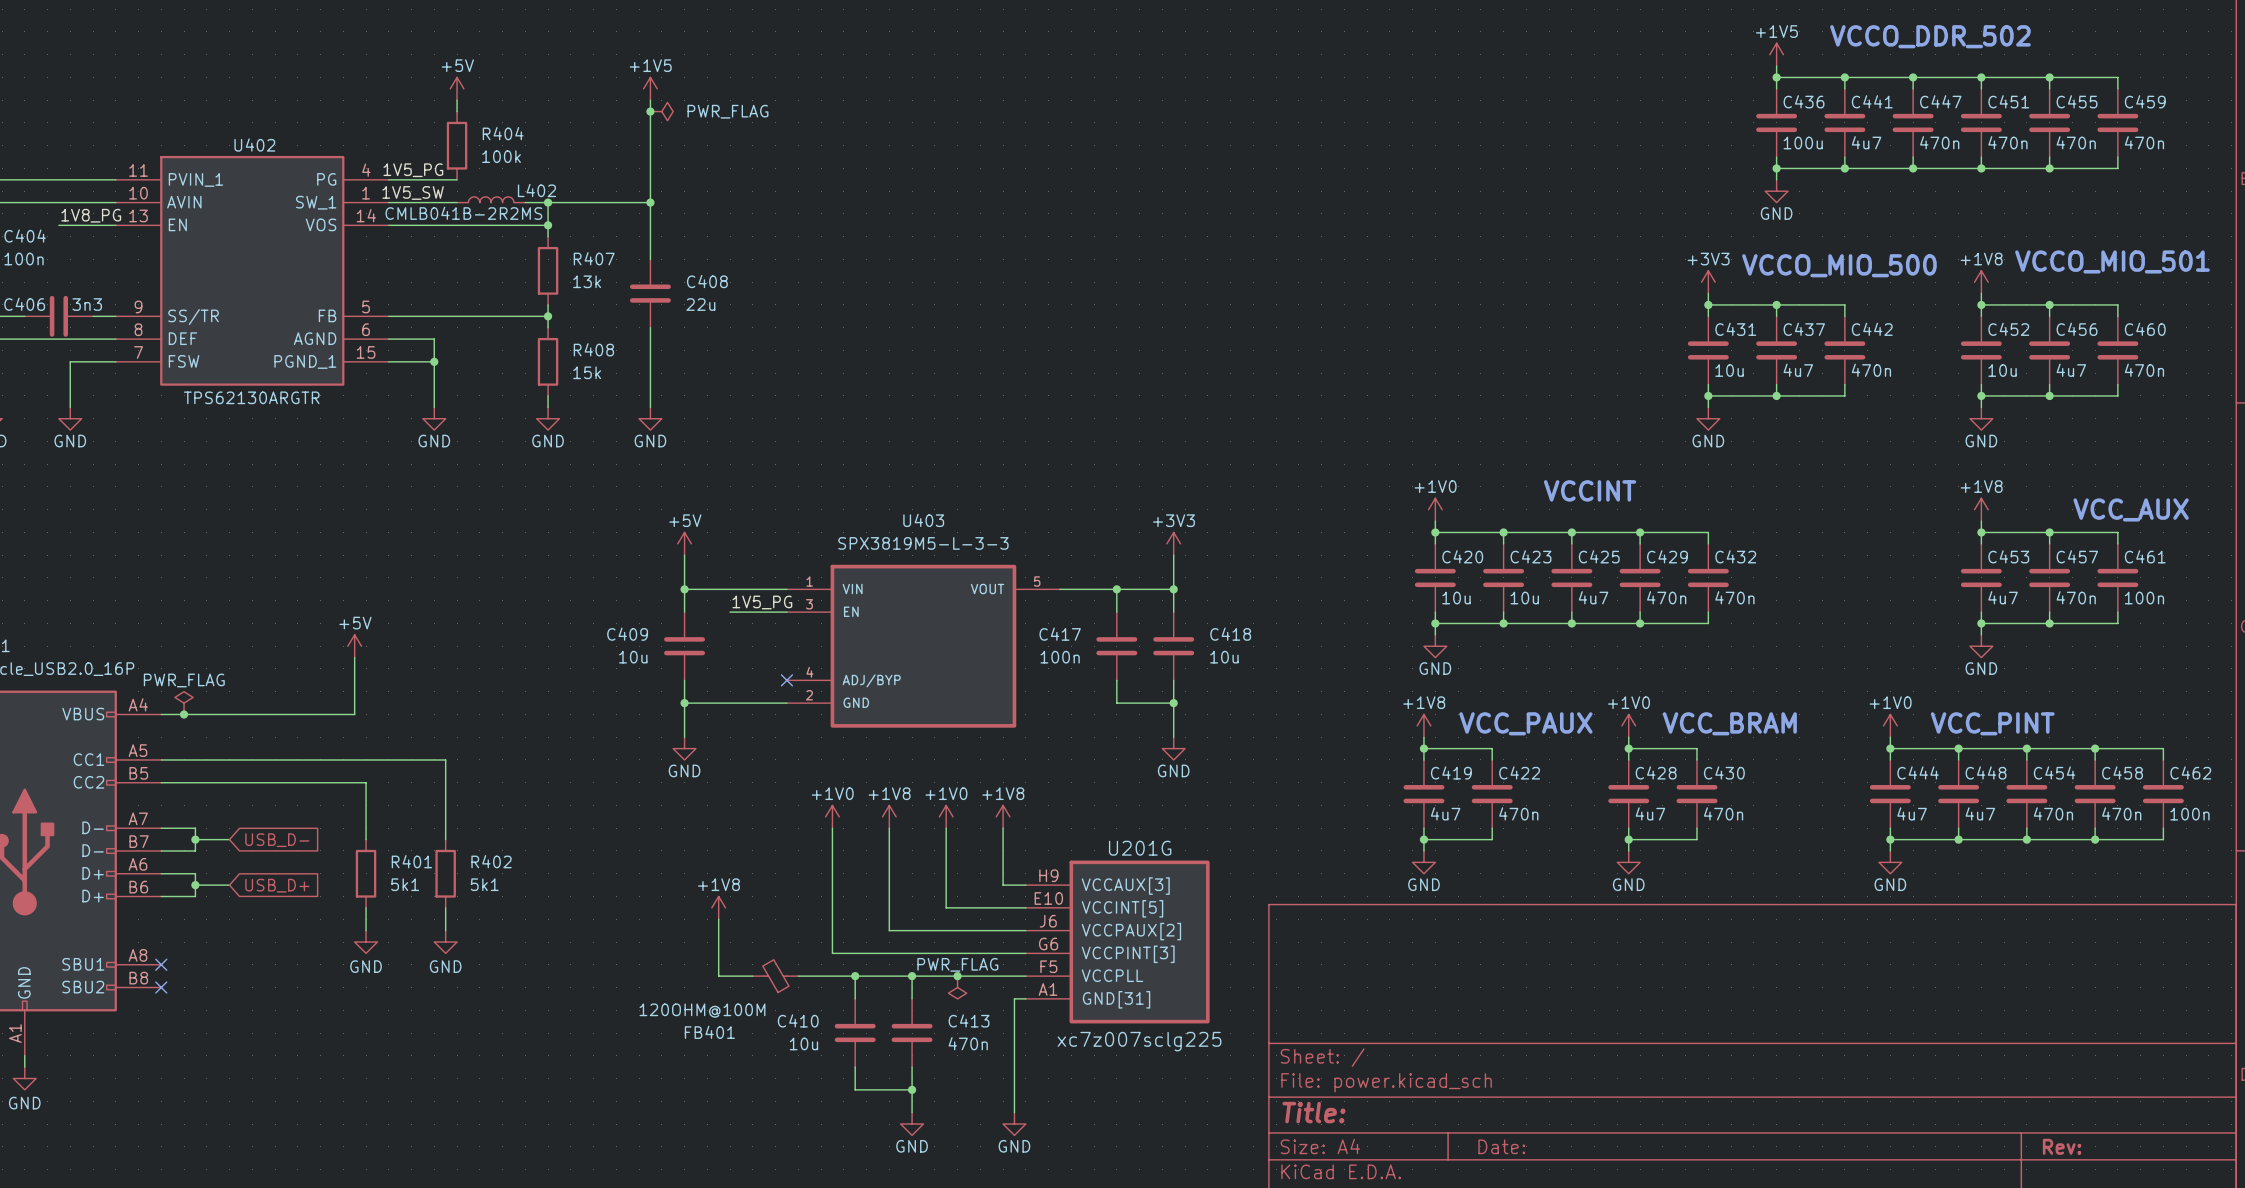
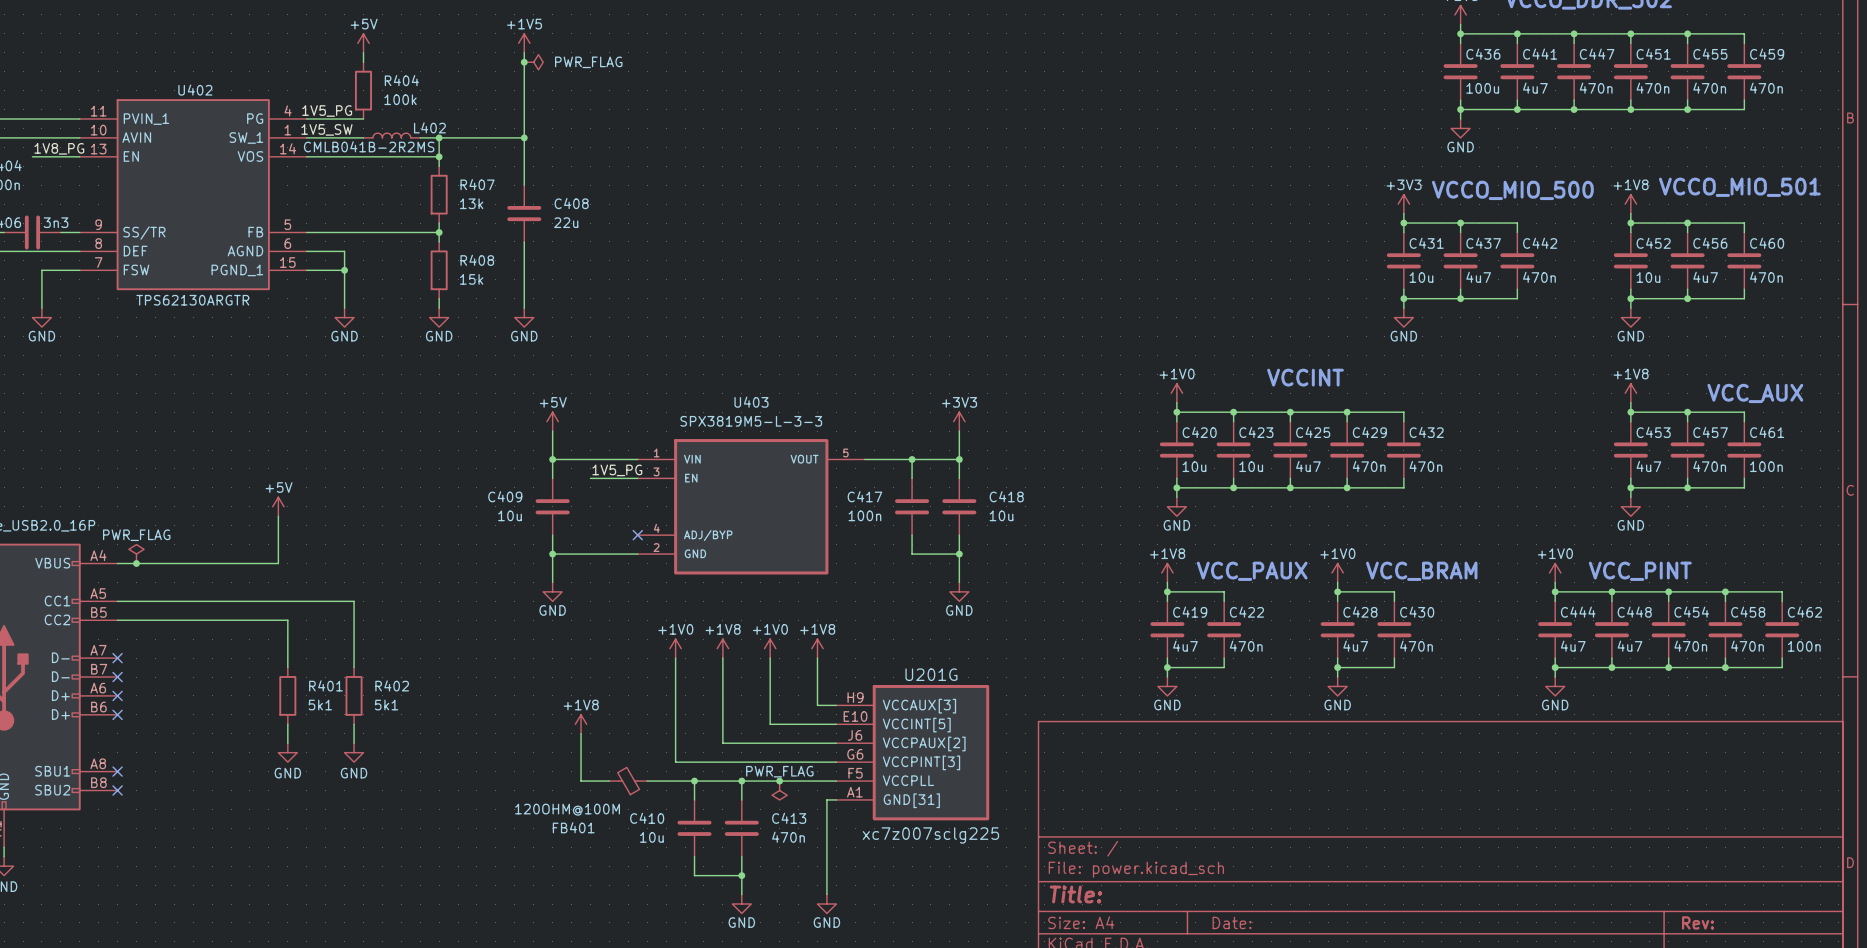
wire: (161, 828) (195, 828) (195, 850) (161, 850) -> none
no-connect mark: none -> (117, 658)
wire: (195, 839) (229, 839) -> none
junction: (195, 839) -> none
global label: USB_D- (277, 840) -> none
no-connect mark: none -> (117, 677)
wire: (161, 873) (195, 873) (195, 896) (161, 896) -> none
no-connect mark: none -> (117, 695)
wire: (195, 885) (229, 885) -> none
junction: (195, 885) -> none
global label: USB_D+ (277, 885) -> none
no-connect mark: none -> (117, 714)

